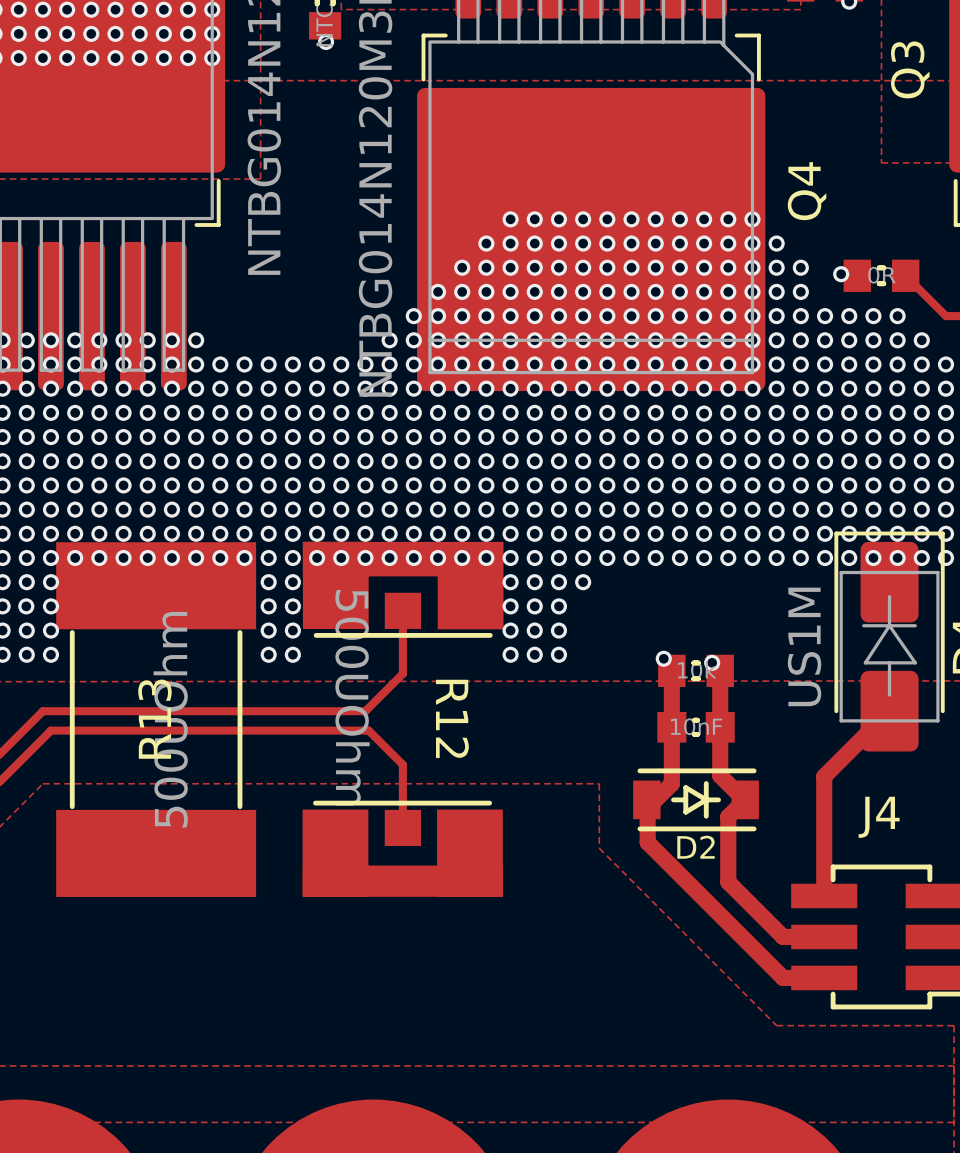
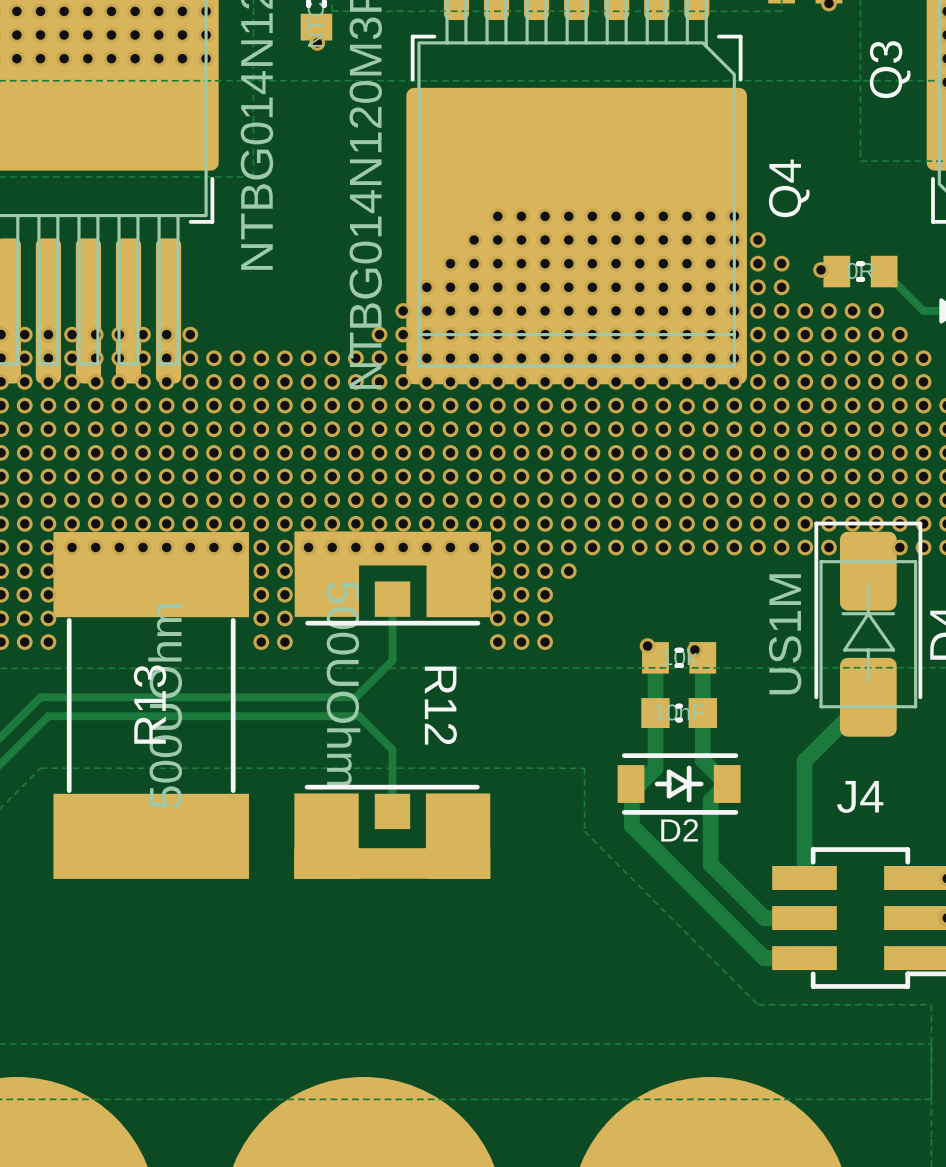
via: (873, 558) -> none
via: (897, 558) -> none

